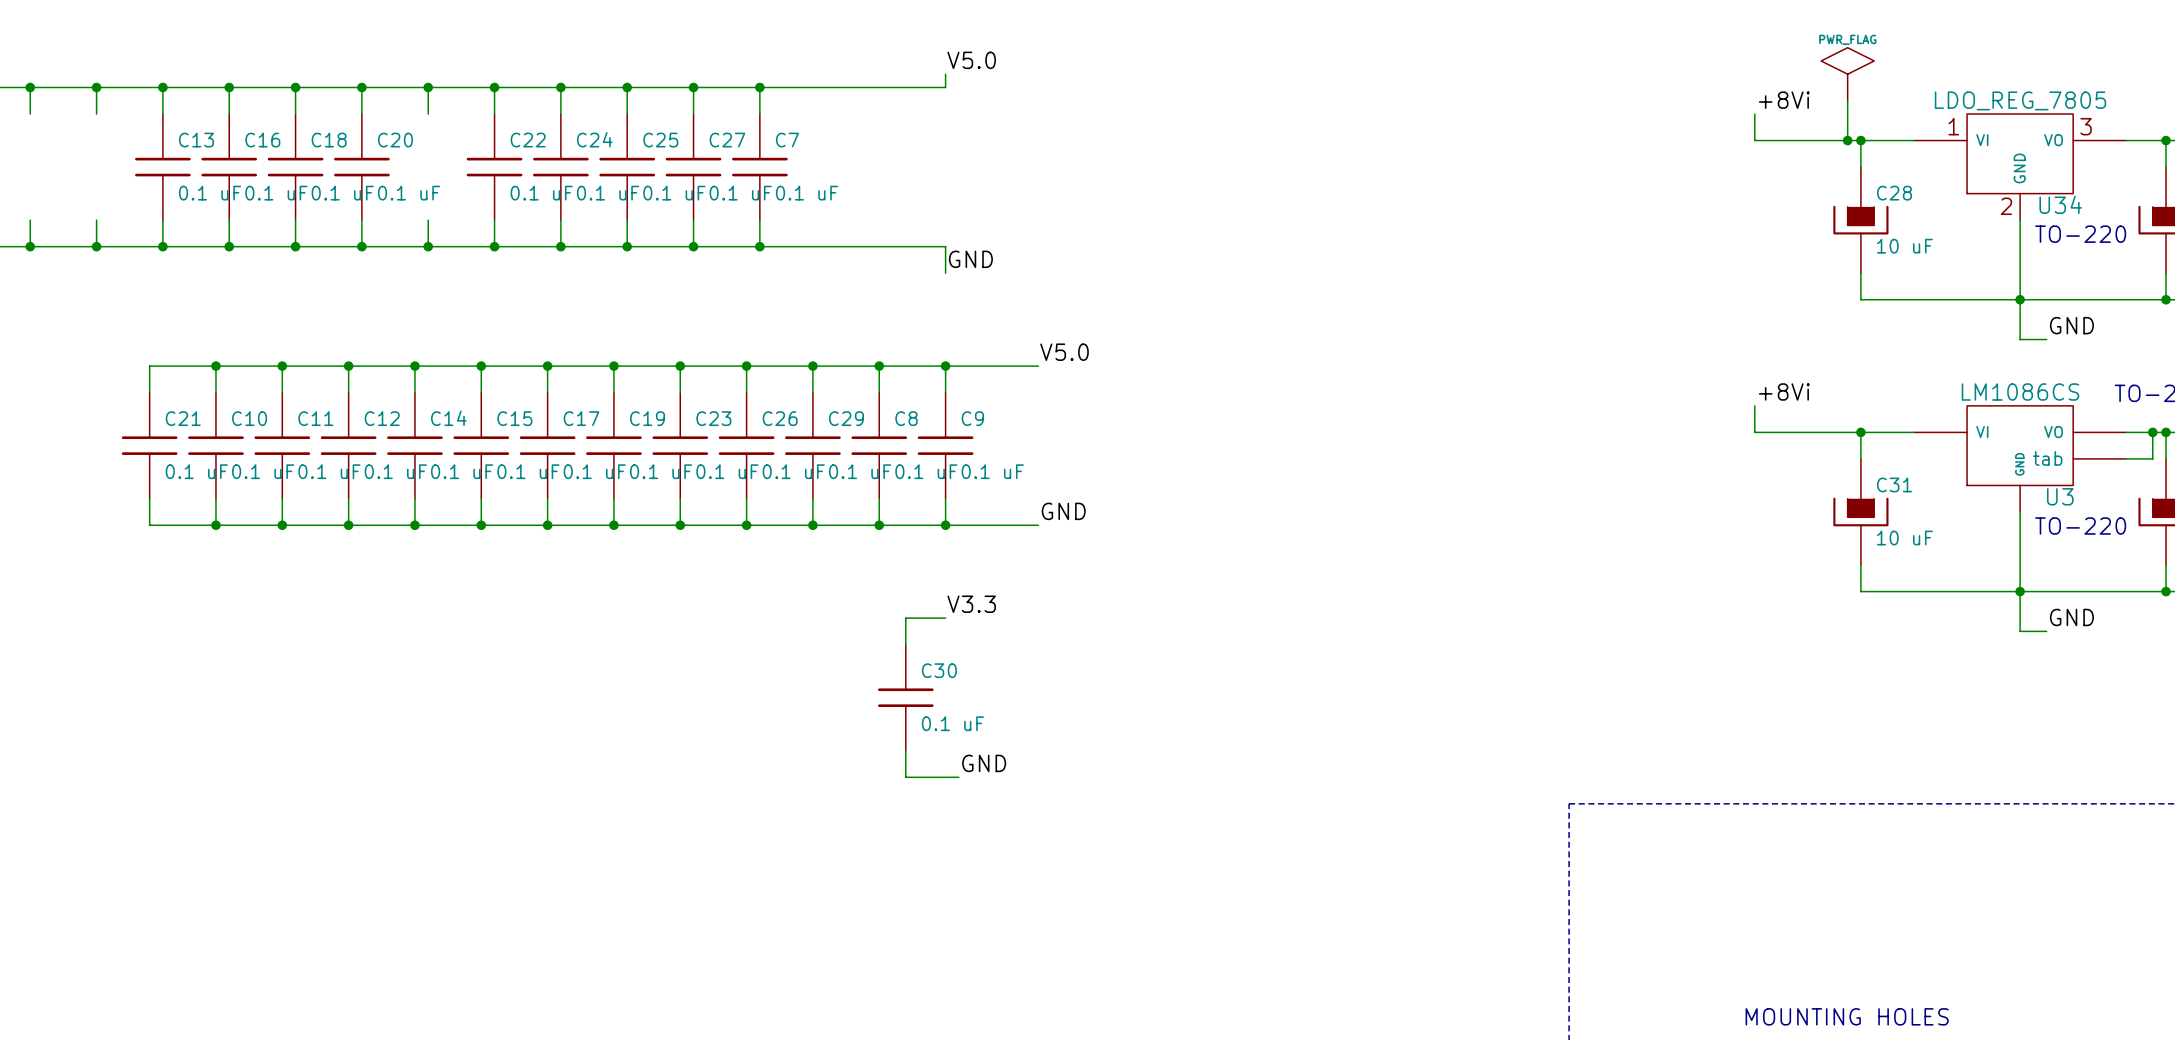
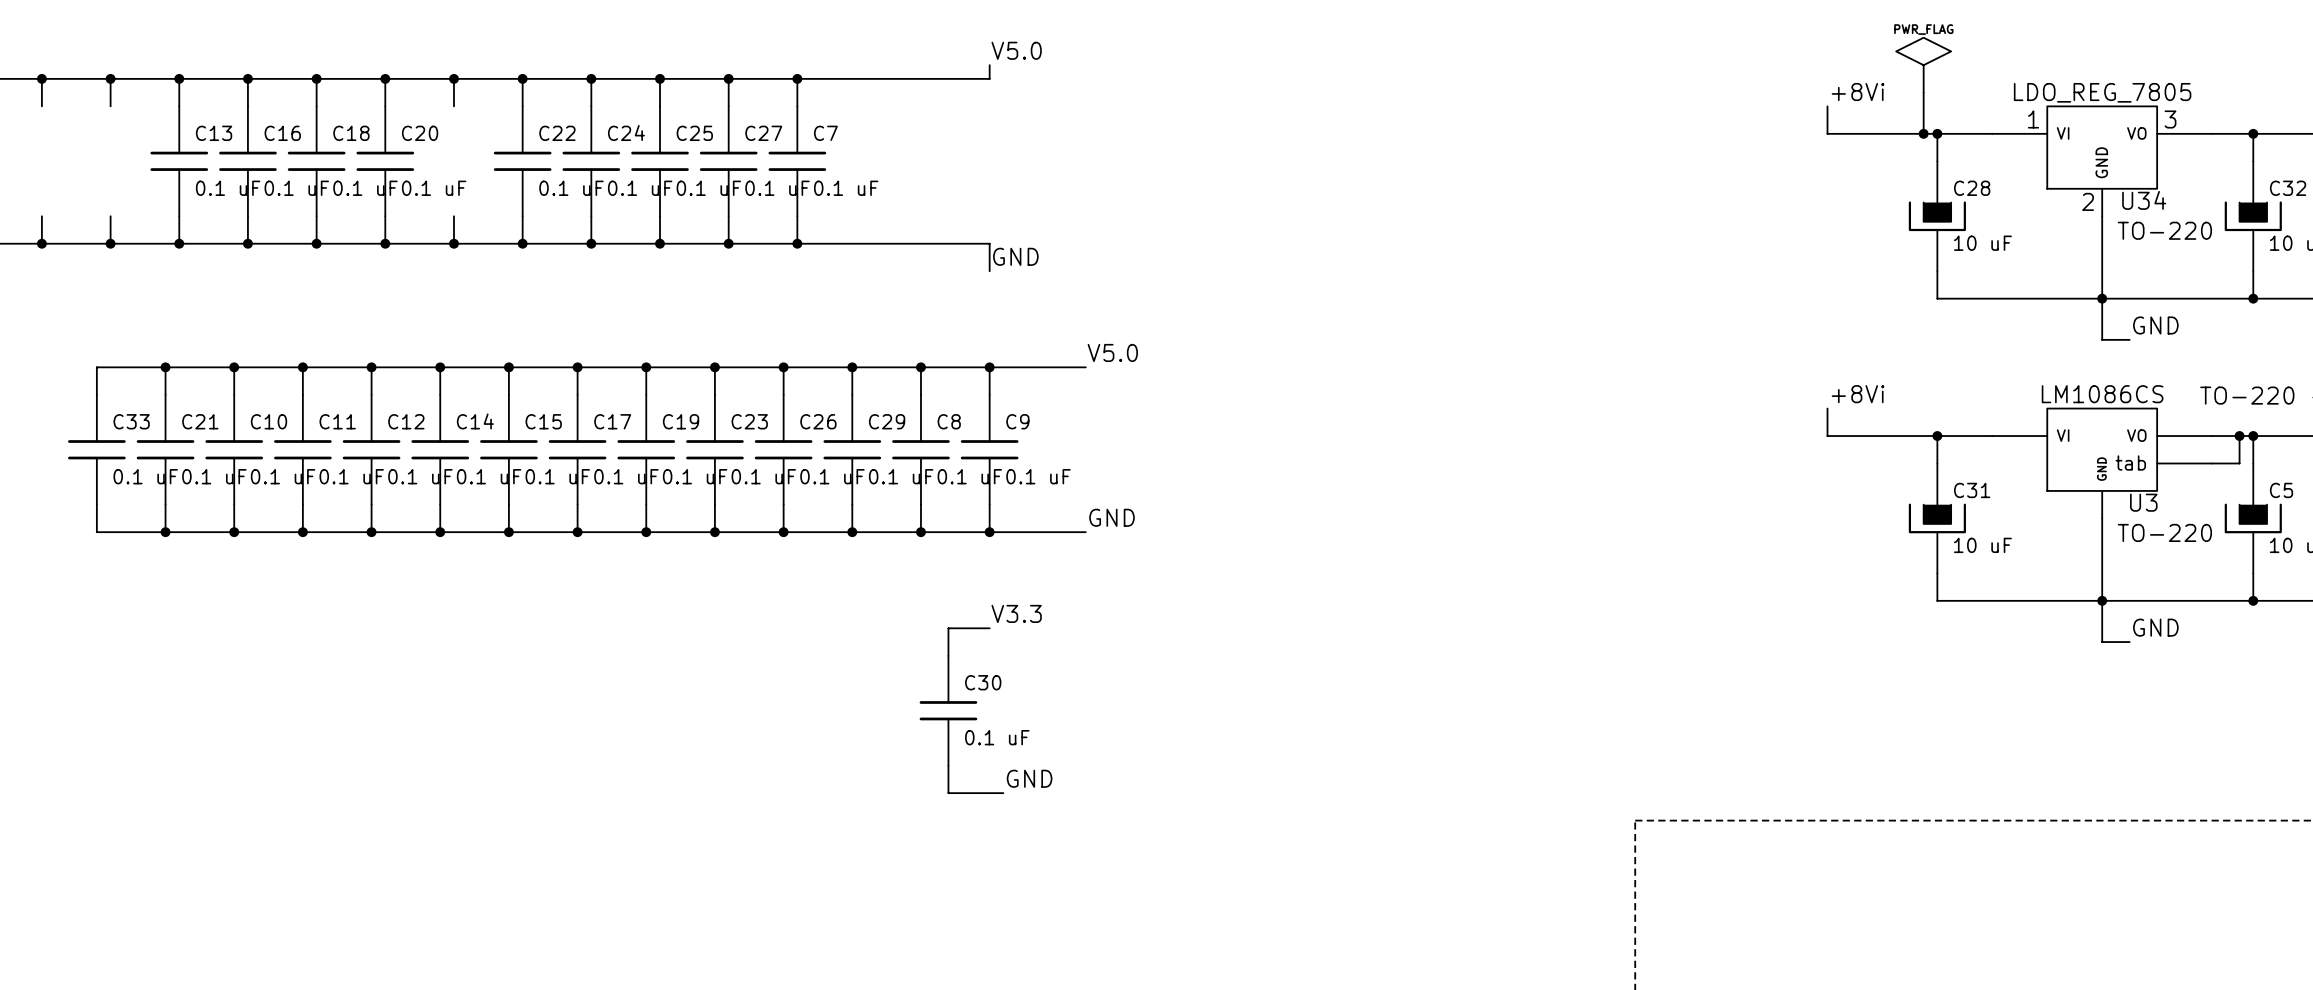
wire: none -> (165, 367) (96, 367) (96, 394)
junction: none -> (165, 367)
C33: none -> 0.1 uF (96, 449)
wire: none -> (96, 504) (96, 532) (165, 532)
junction: none -> (165, 532)

